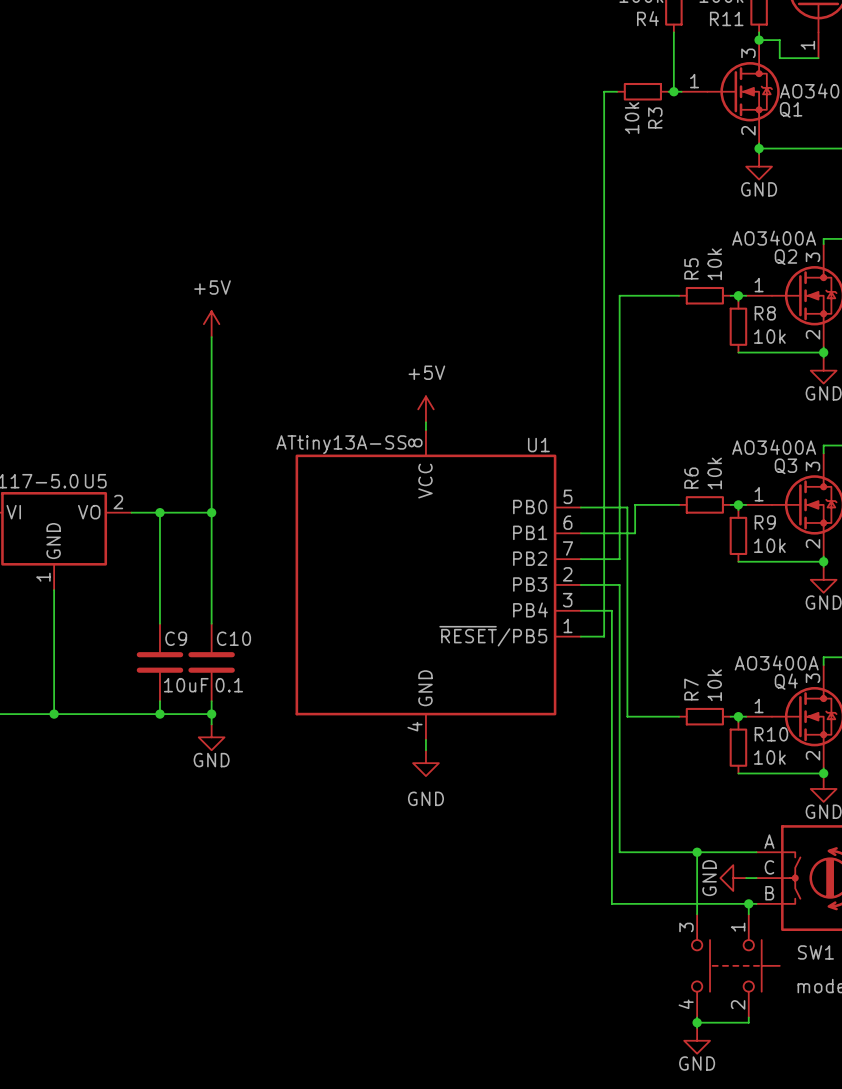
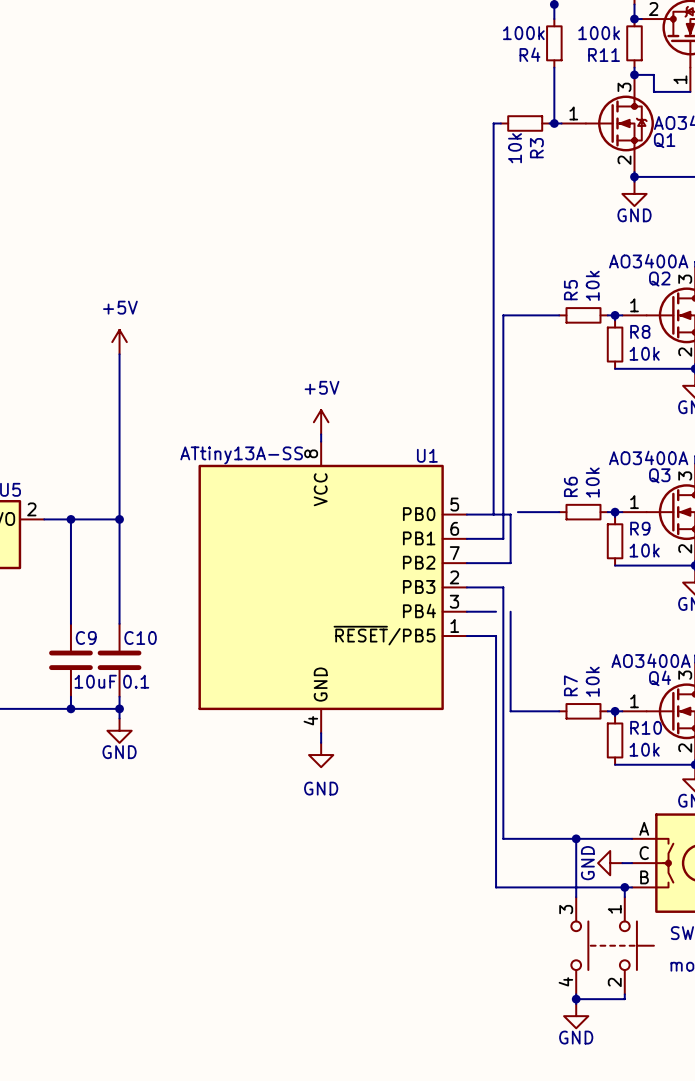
wire: (609, 91) (604, 91) (604, 636) -> (493, 123) (493, 514)
wire: (635, 504) (635, 533) (619, 533) (619, 559) -> none
wire: (627, 559) (627, 610) -> (510, 563) (503, 563)
wire: (611, 610) (611, 636) -> (488, 636) (496, 636)

